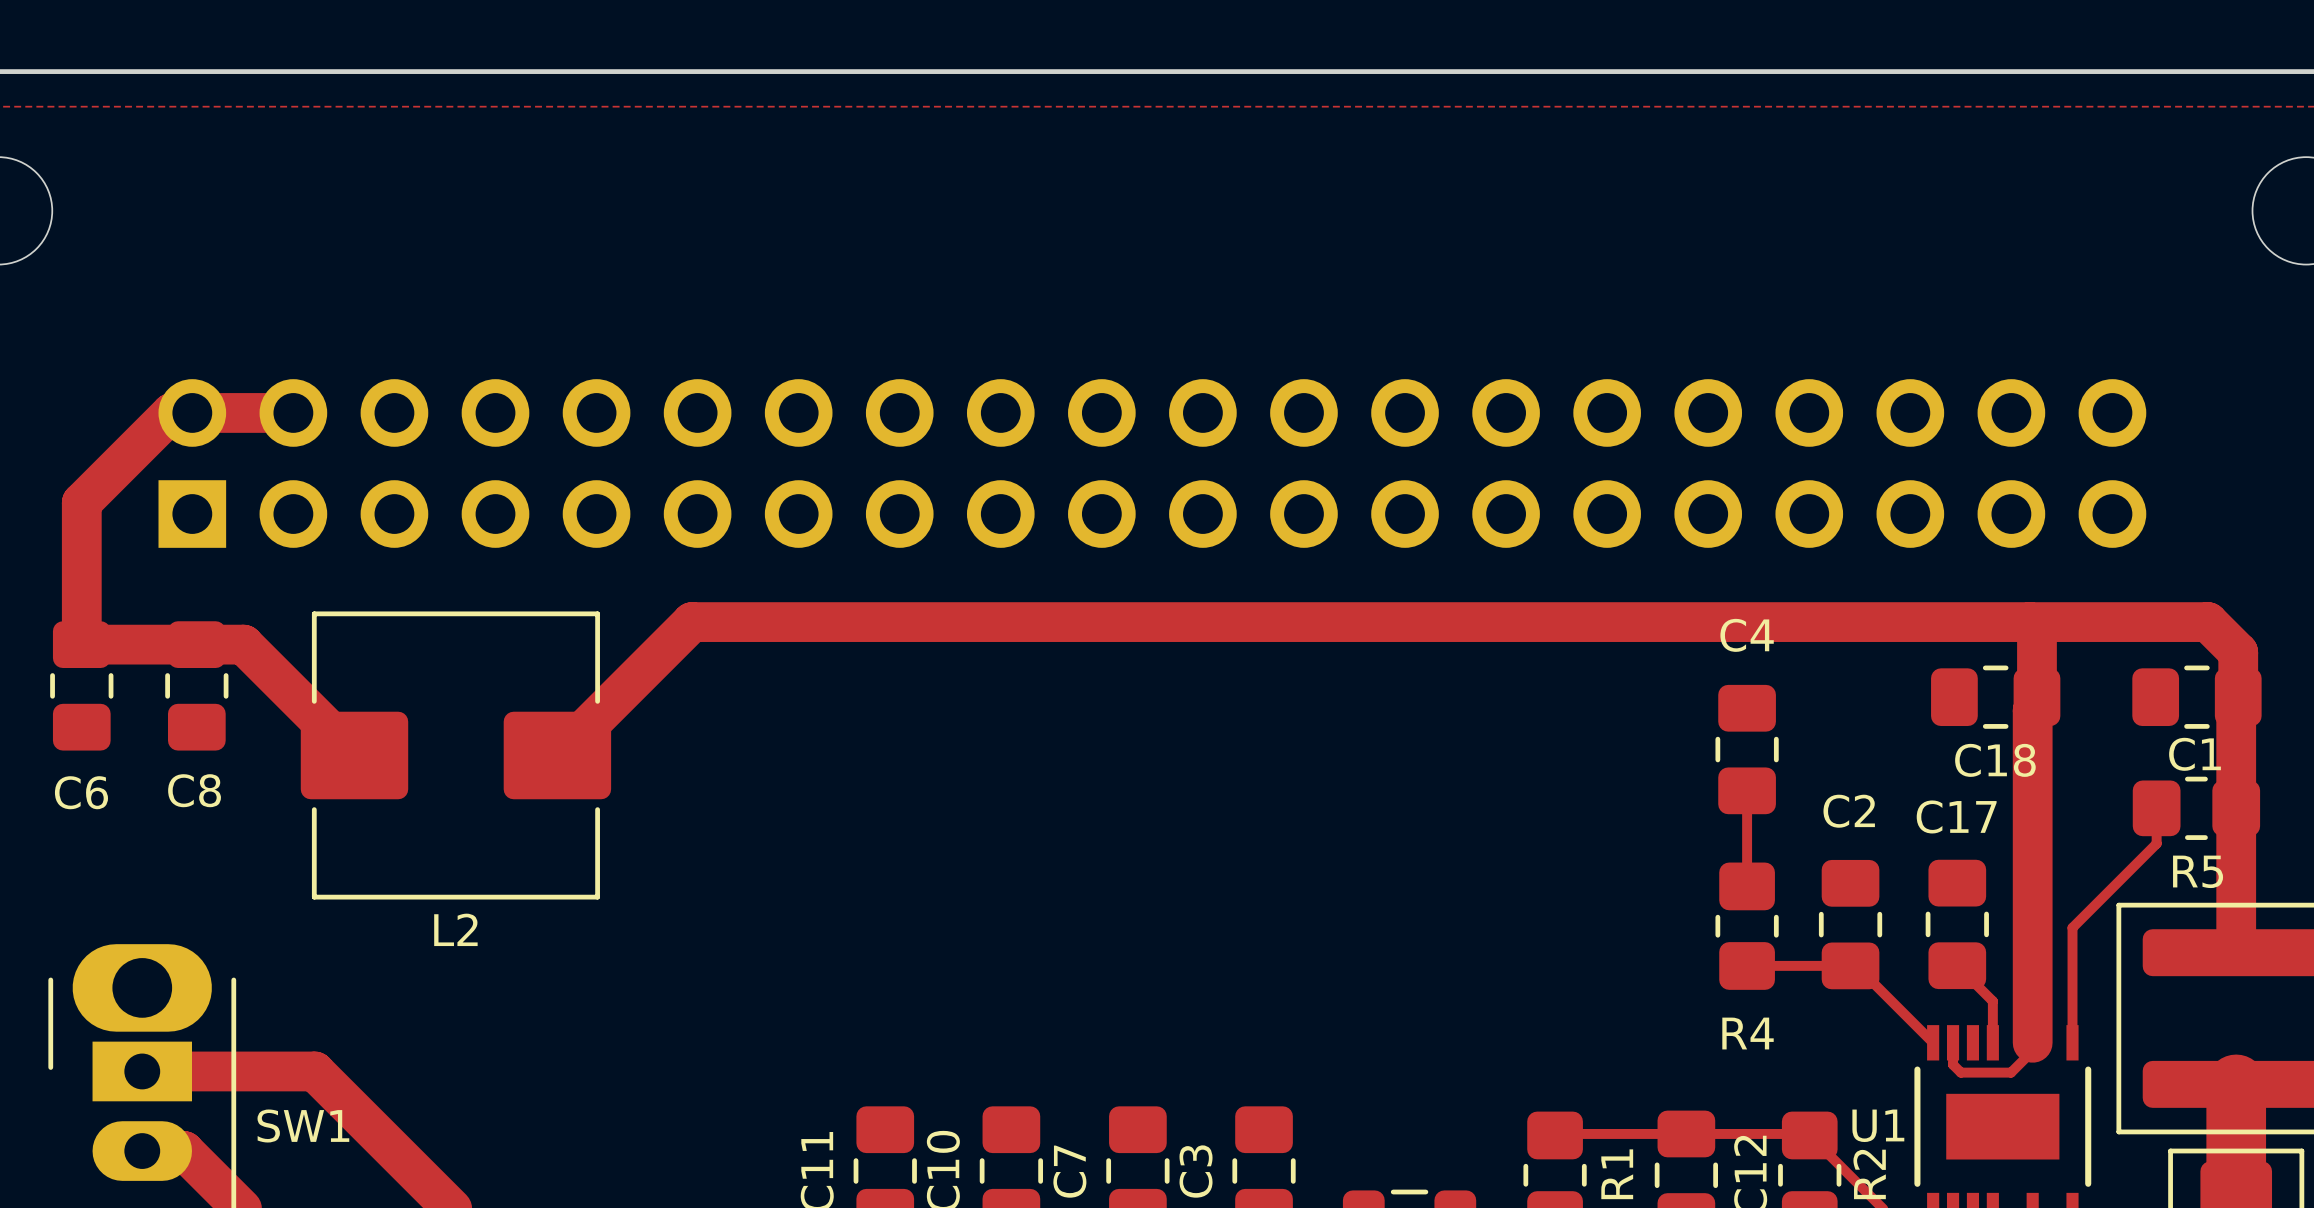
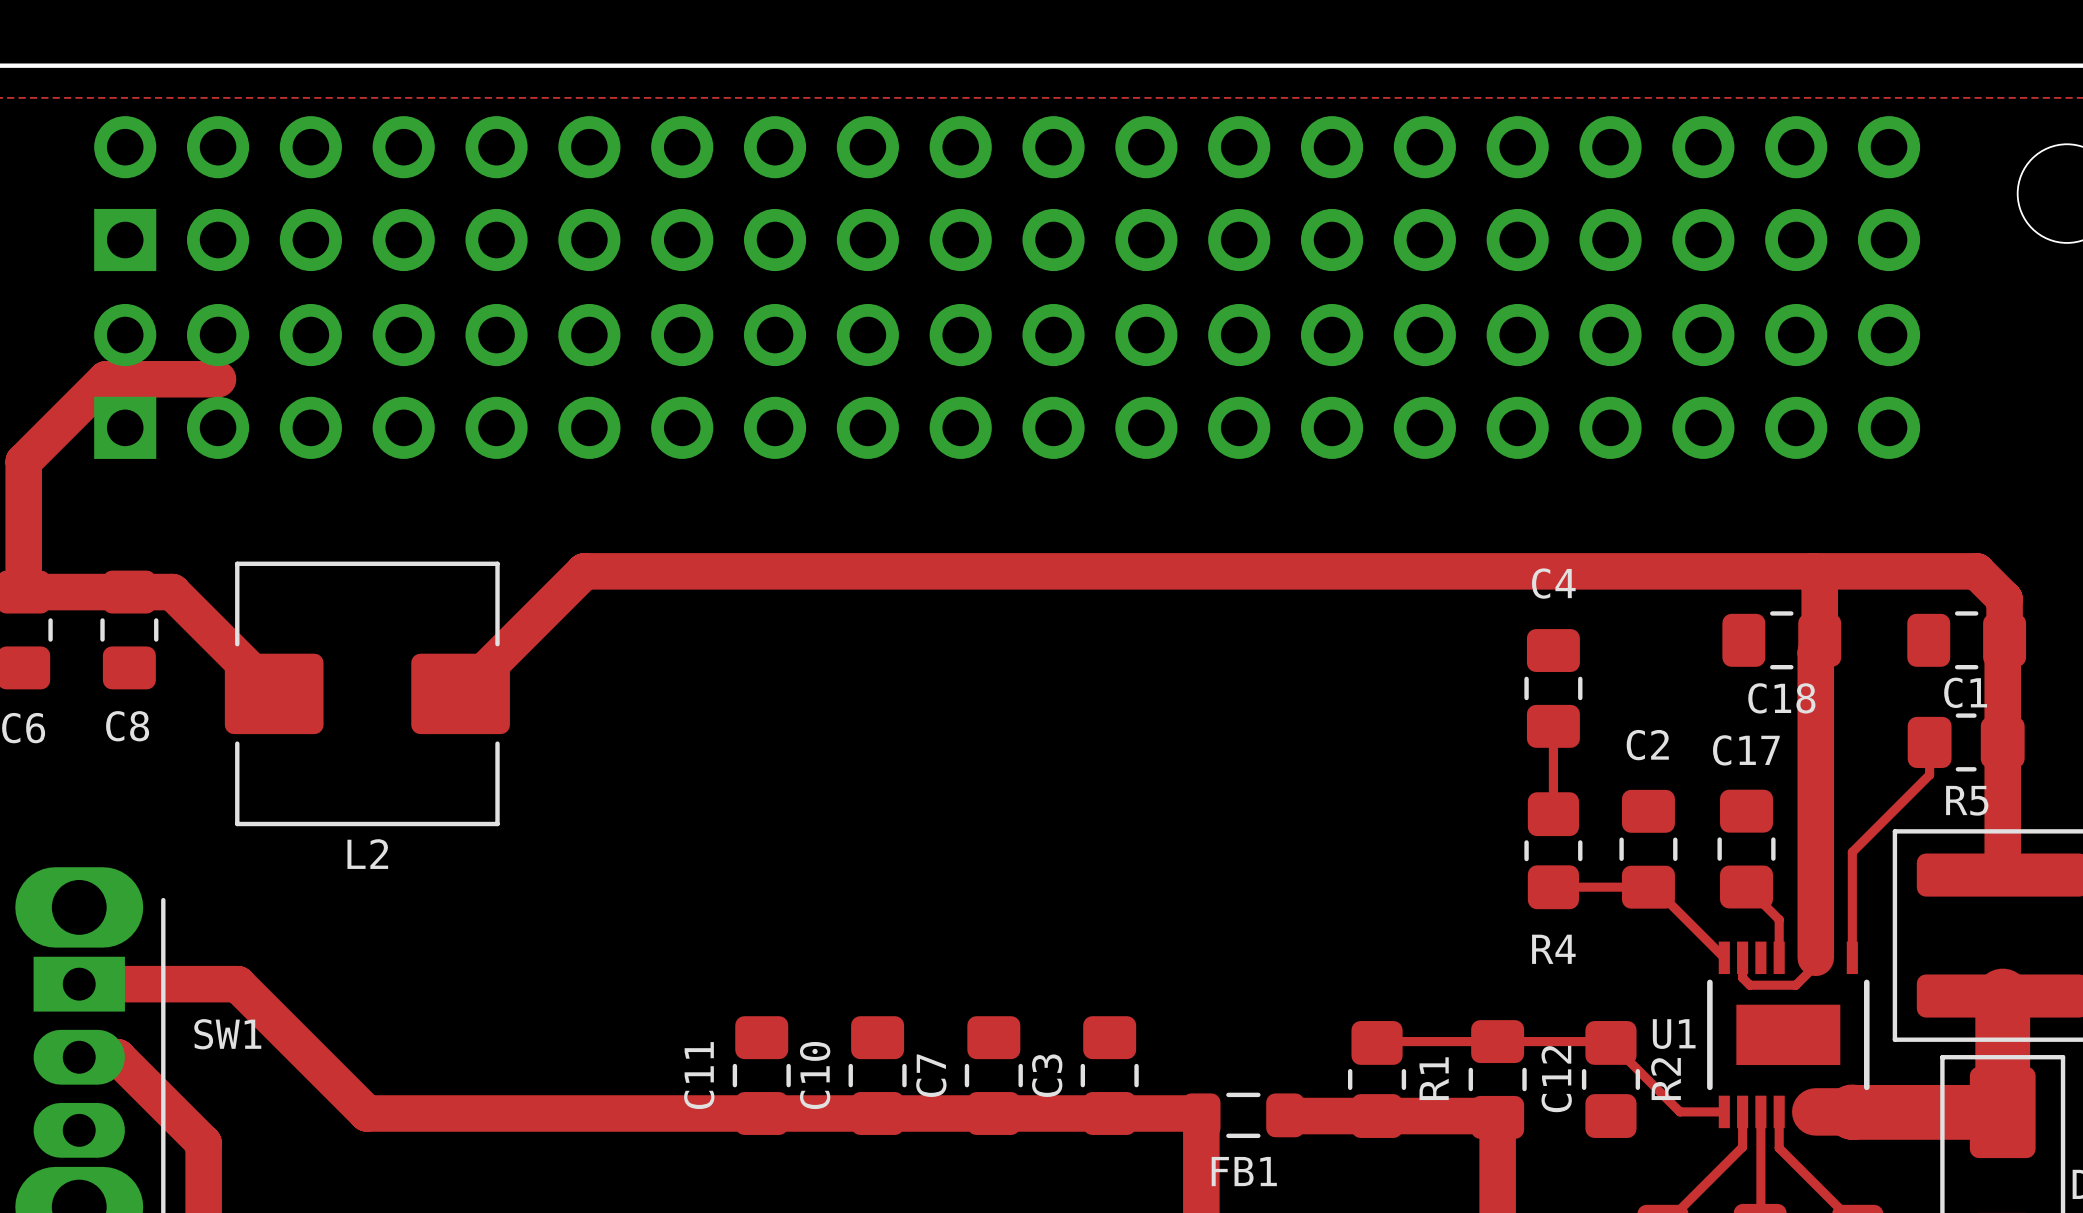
part: none -> (1007, 193)
part position: (1152, 463) -> (1007, 381)

